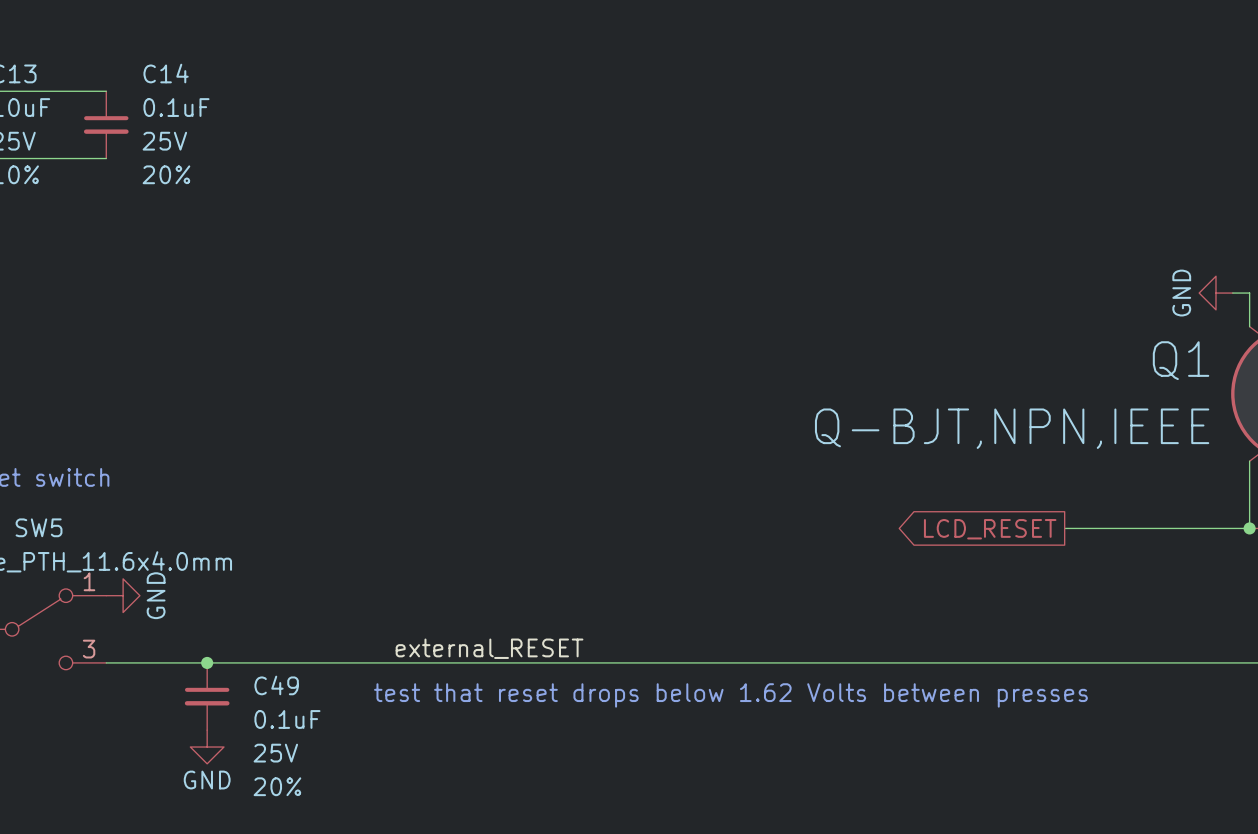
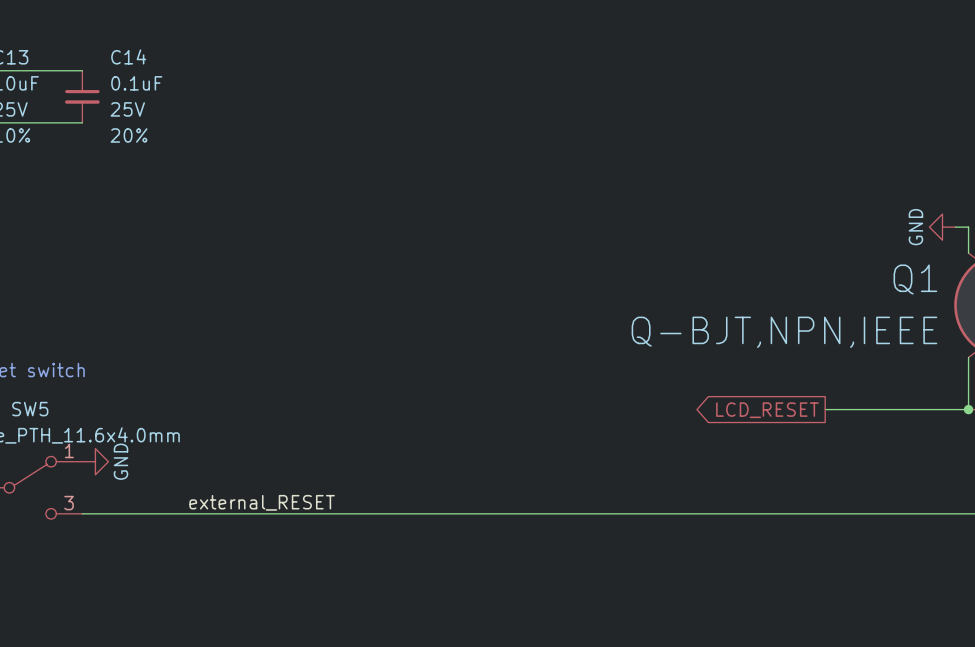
label position: external_RESET (489, 648) -> external_RESET (262, 502)
junction: (207, 662) -> none
text: test that reset drops below 1.62 Volts between presses (730, 695) -> none
C49: 0.1uF (207, 696) -> none
power symbol: GND (207, 747) -> none

